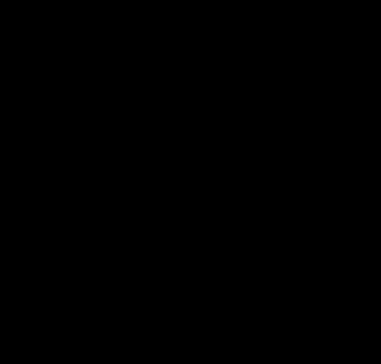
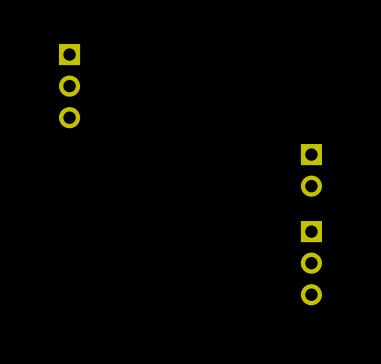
part: none -> (69, 86)
part: none -> (311, 170)
part: none -> (311, 263)

